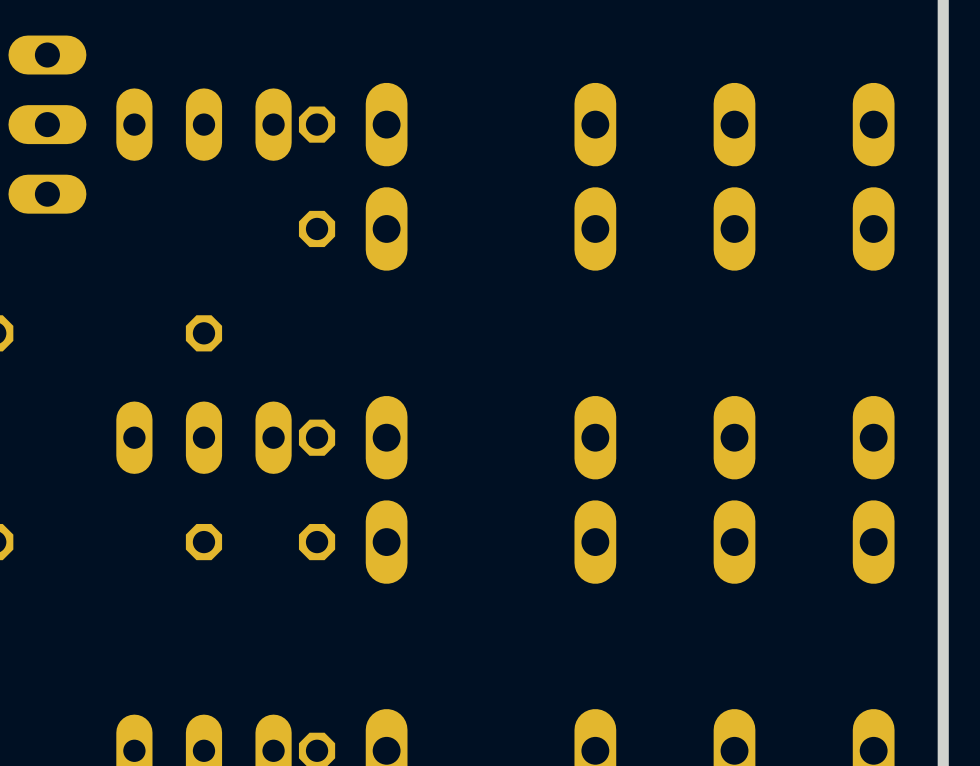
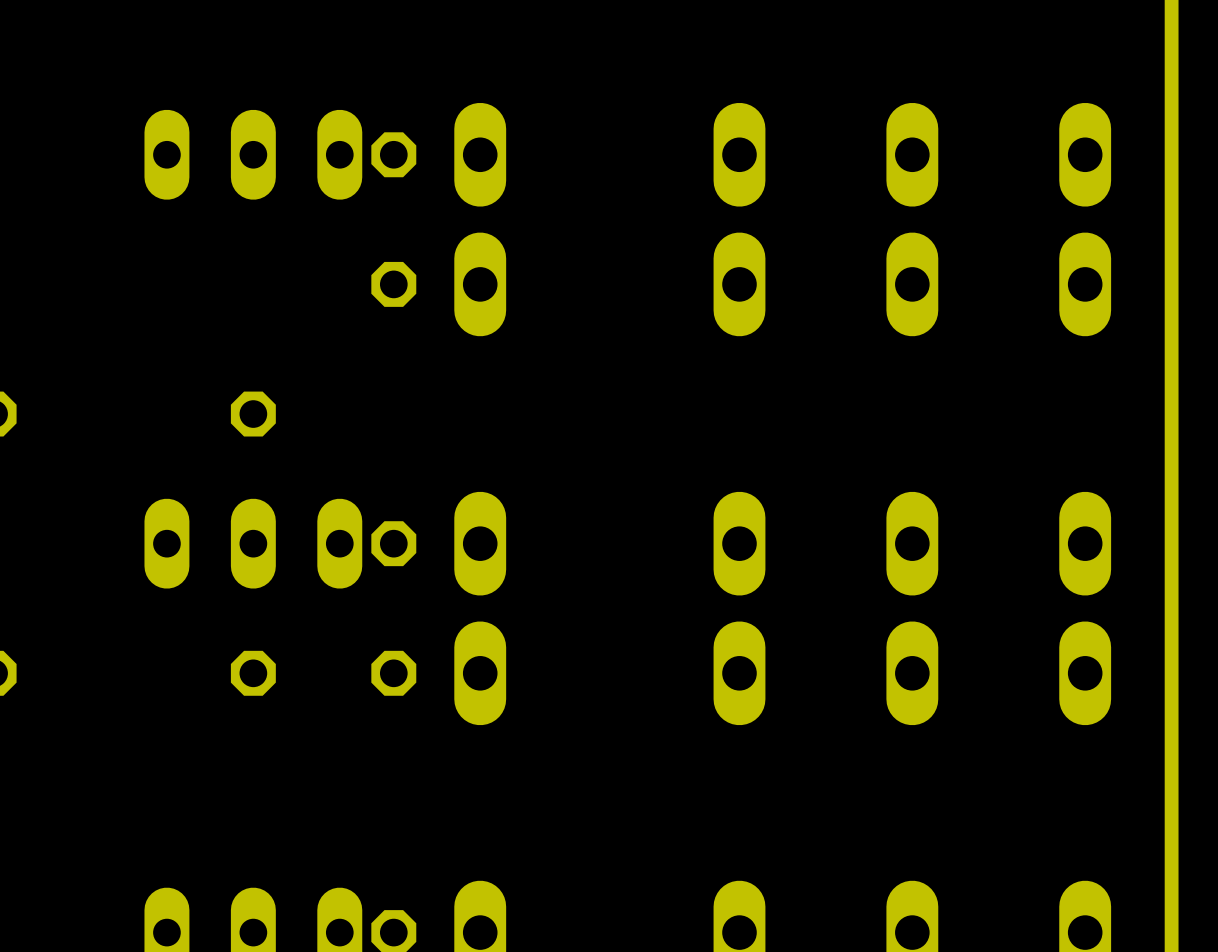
part: (47, 124) -> none

